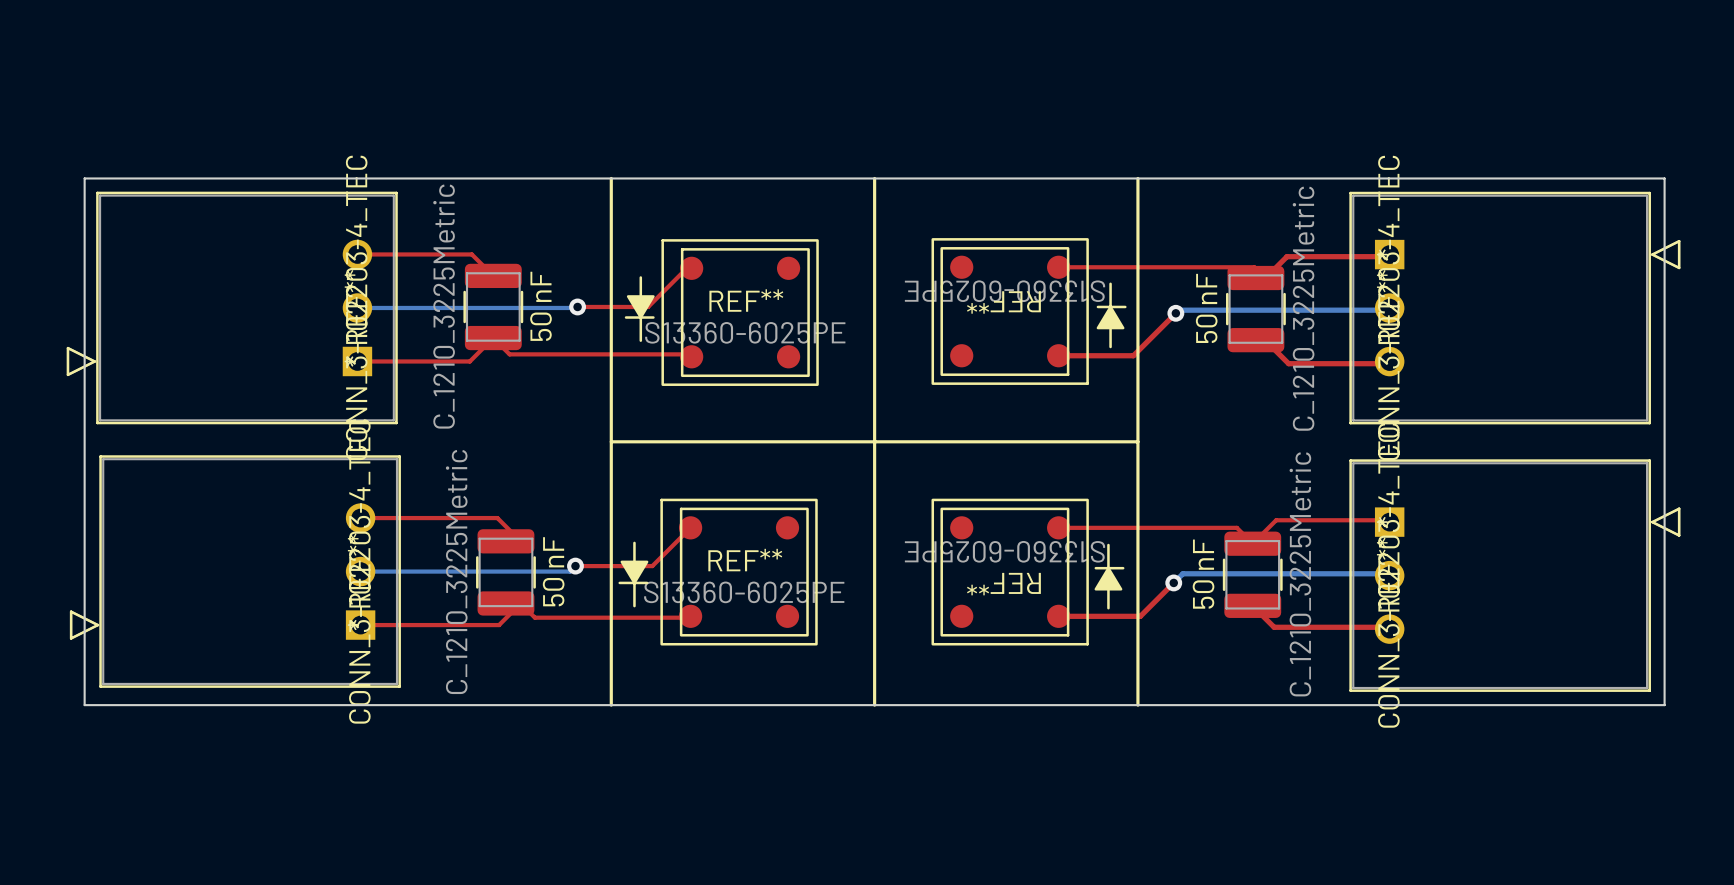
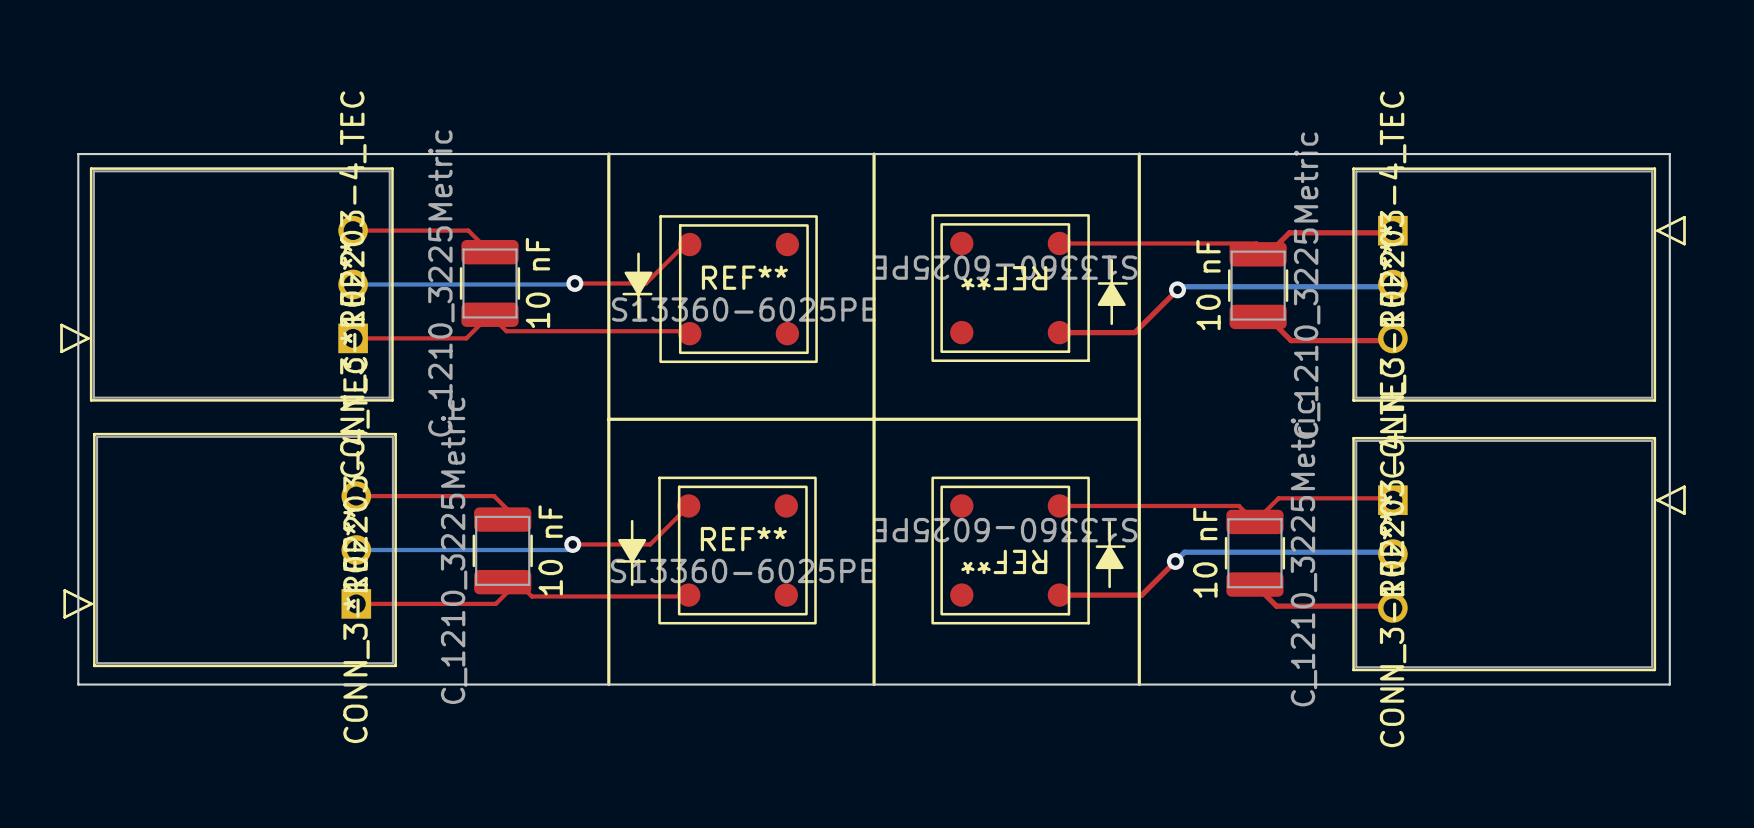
50 nF name: 50 nF (541, 306) -> 10 nF (537, 282)
50 nF name: 50 nF (1206, 308) -> 10 nF (1208, 285)
50 nF name: 50 nF (553, 571) -> 10 nF (550, 550)
50 nF name: 50 nF (1203, 574) -> 10 nF (1205, 552)

